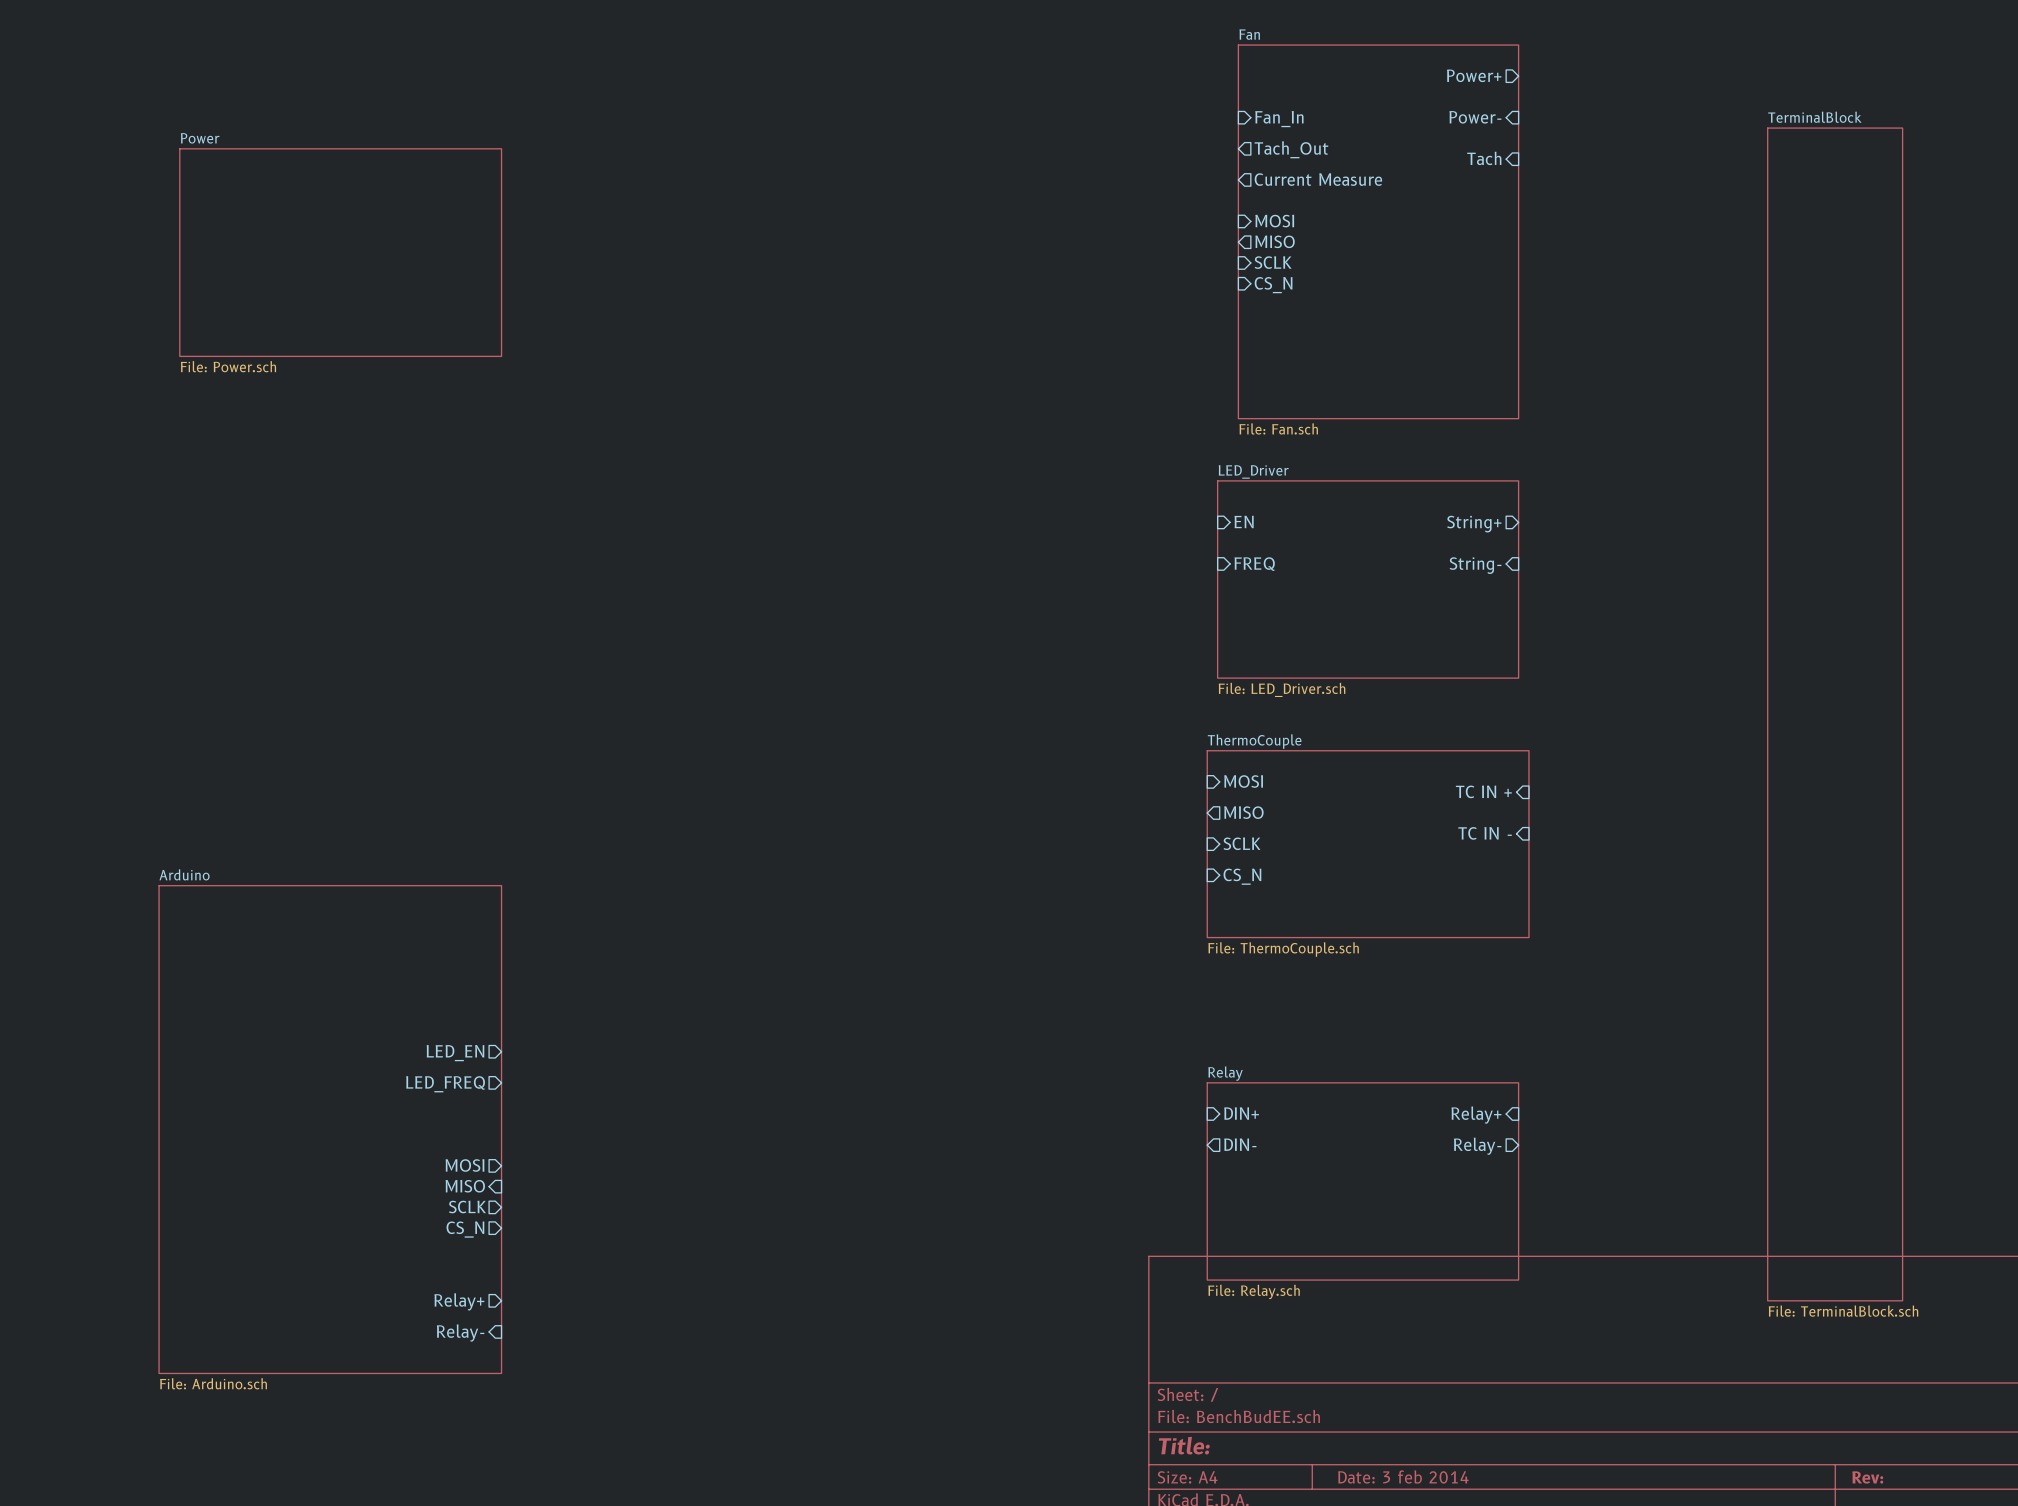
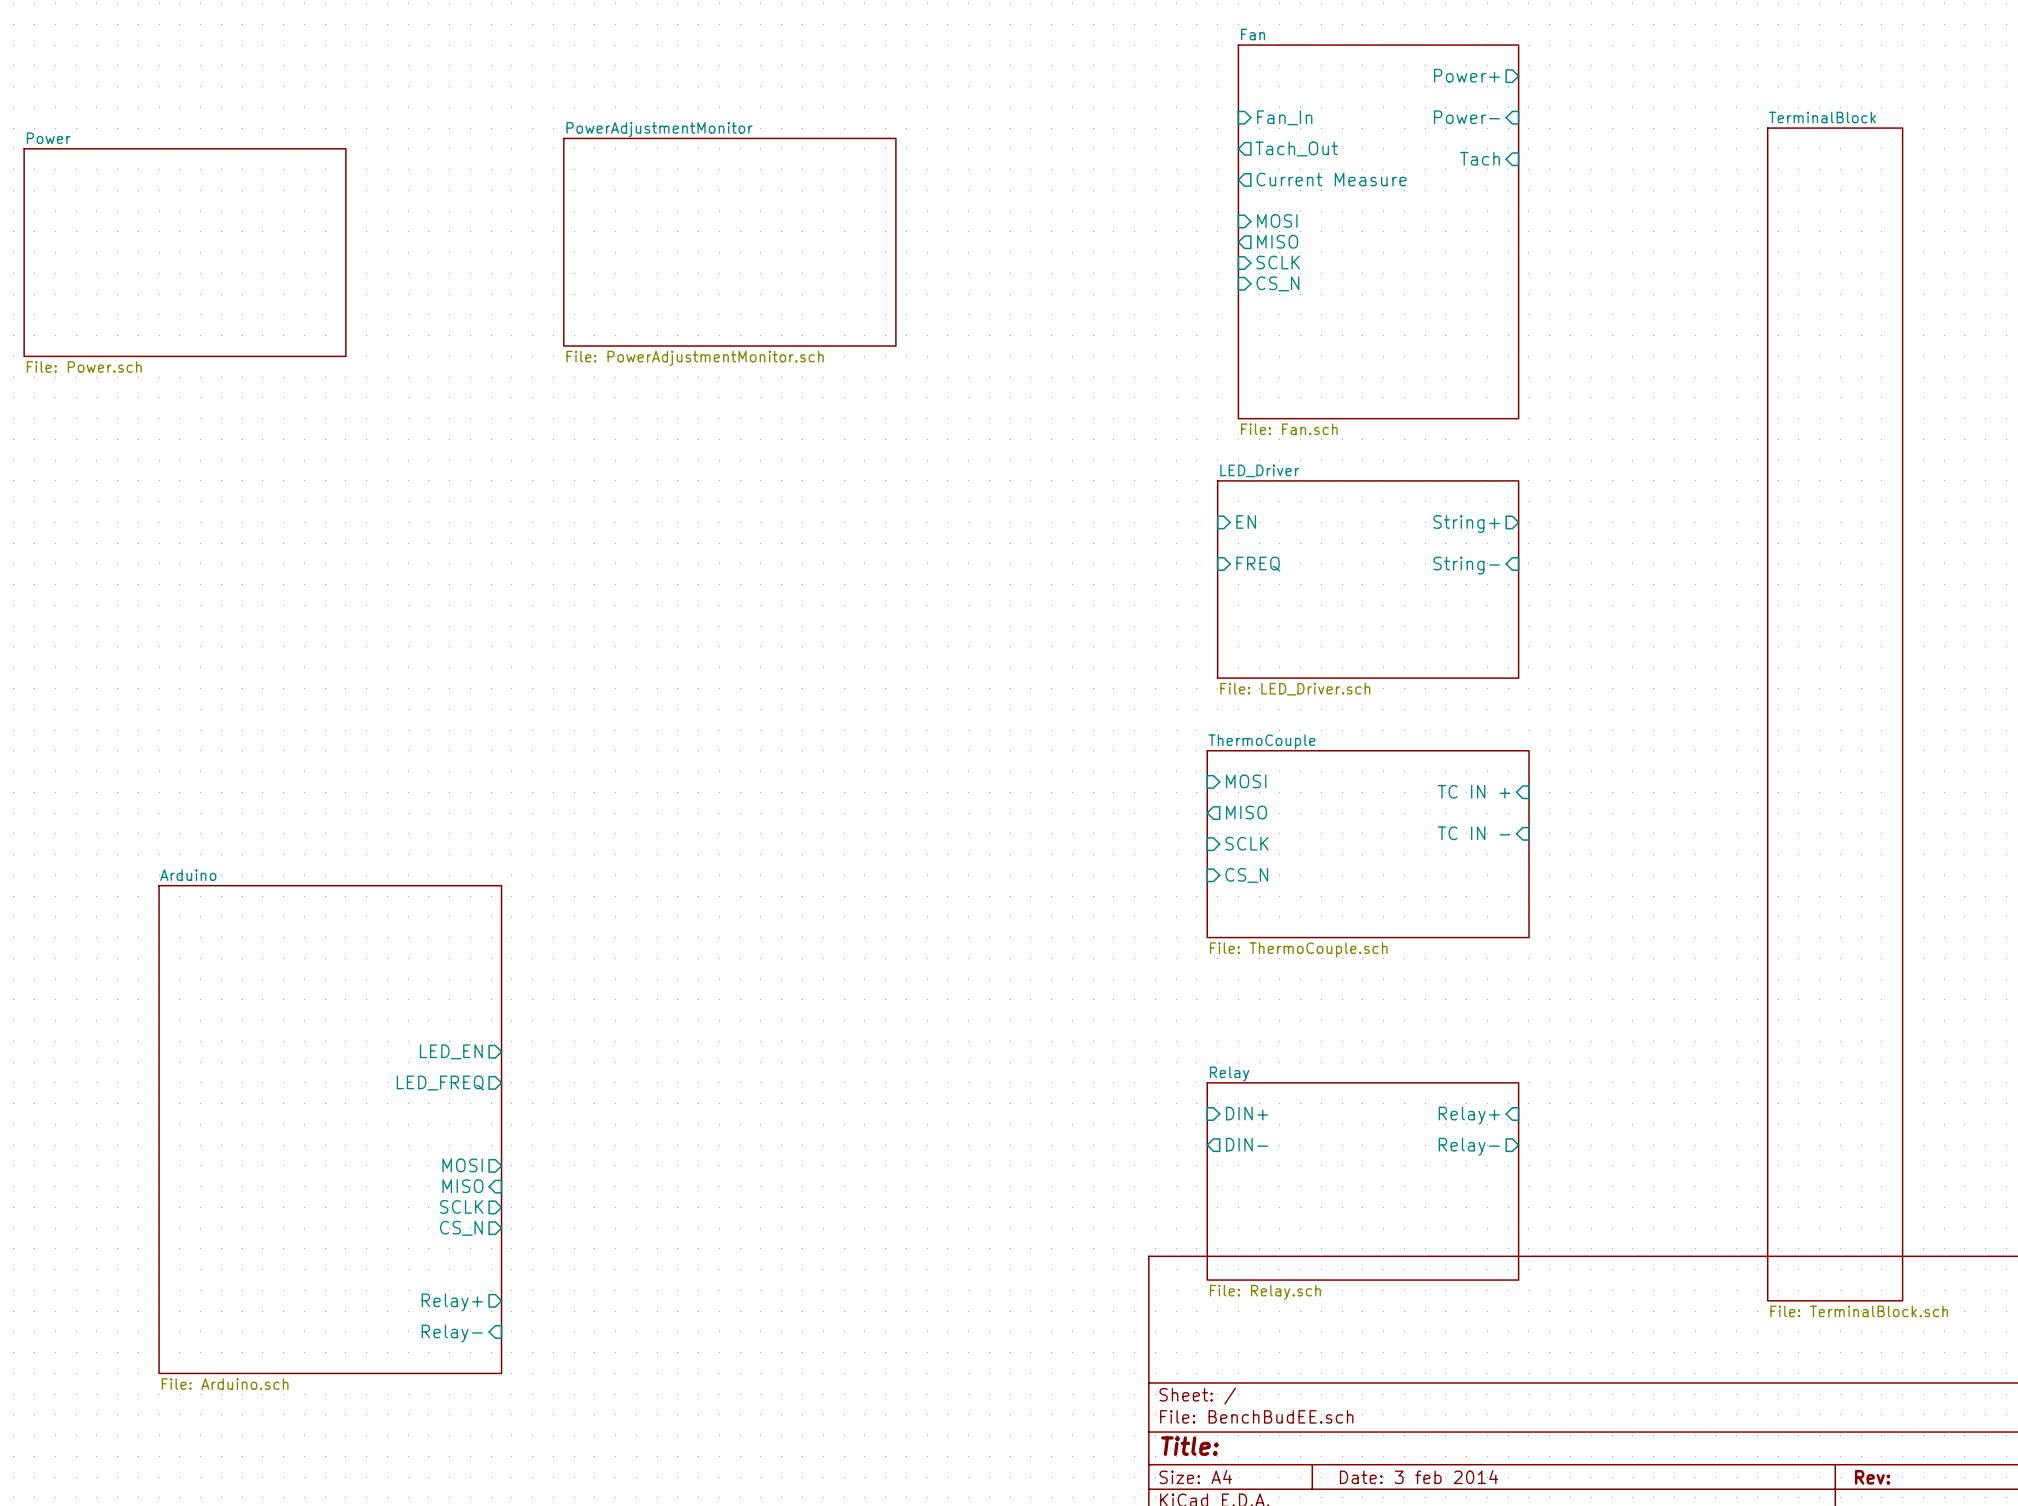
sheet PowerAdjustmentMonitor: none -> File: PowerAdjustmentMonitor.sch (729, 242)
sheet Power position: (340, 252) -> (185, 252)

